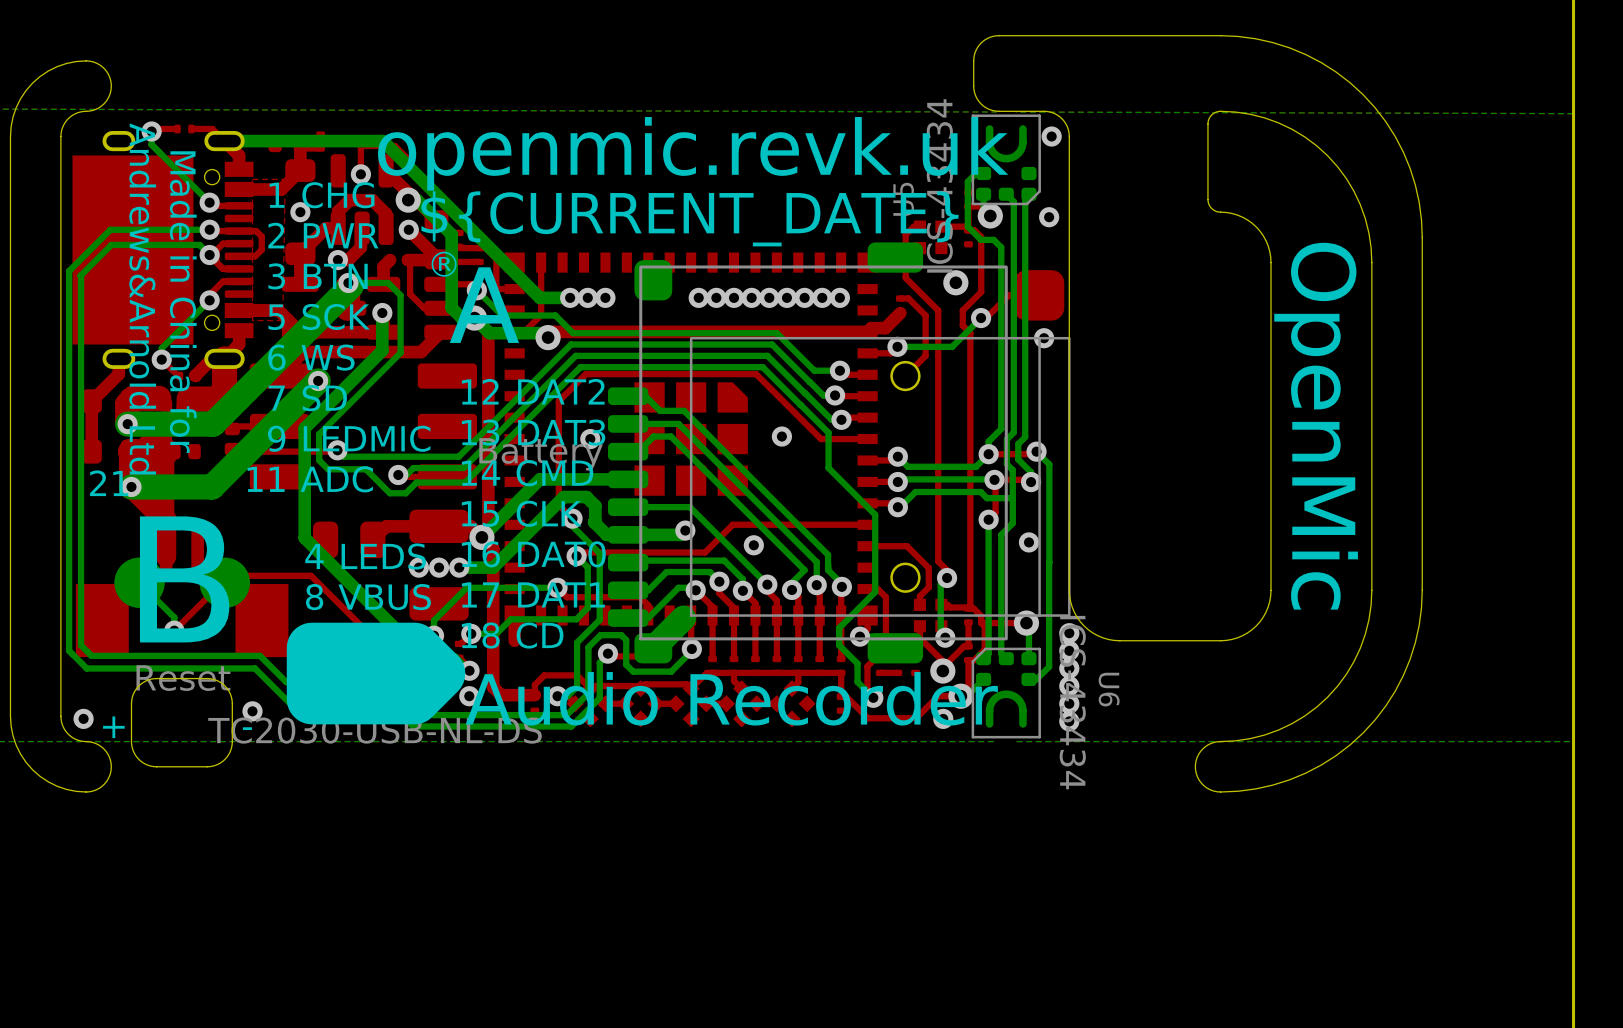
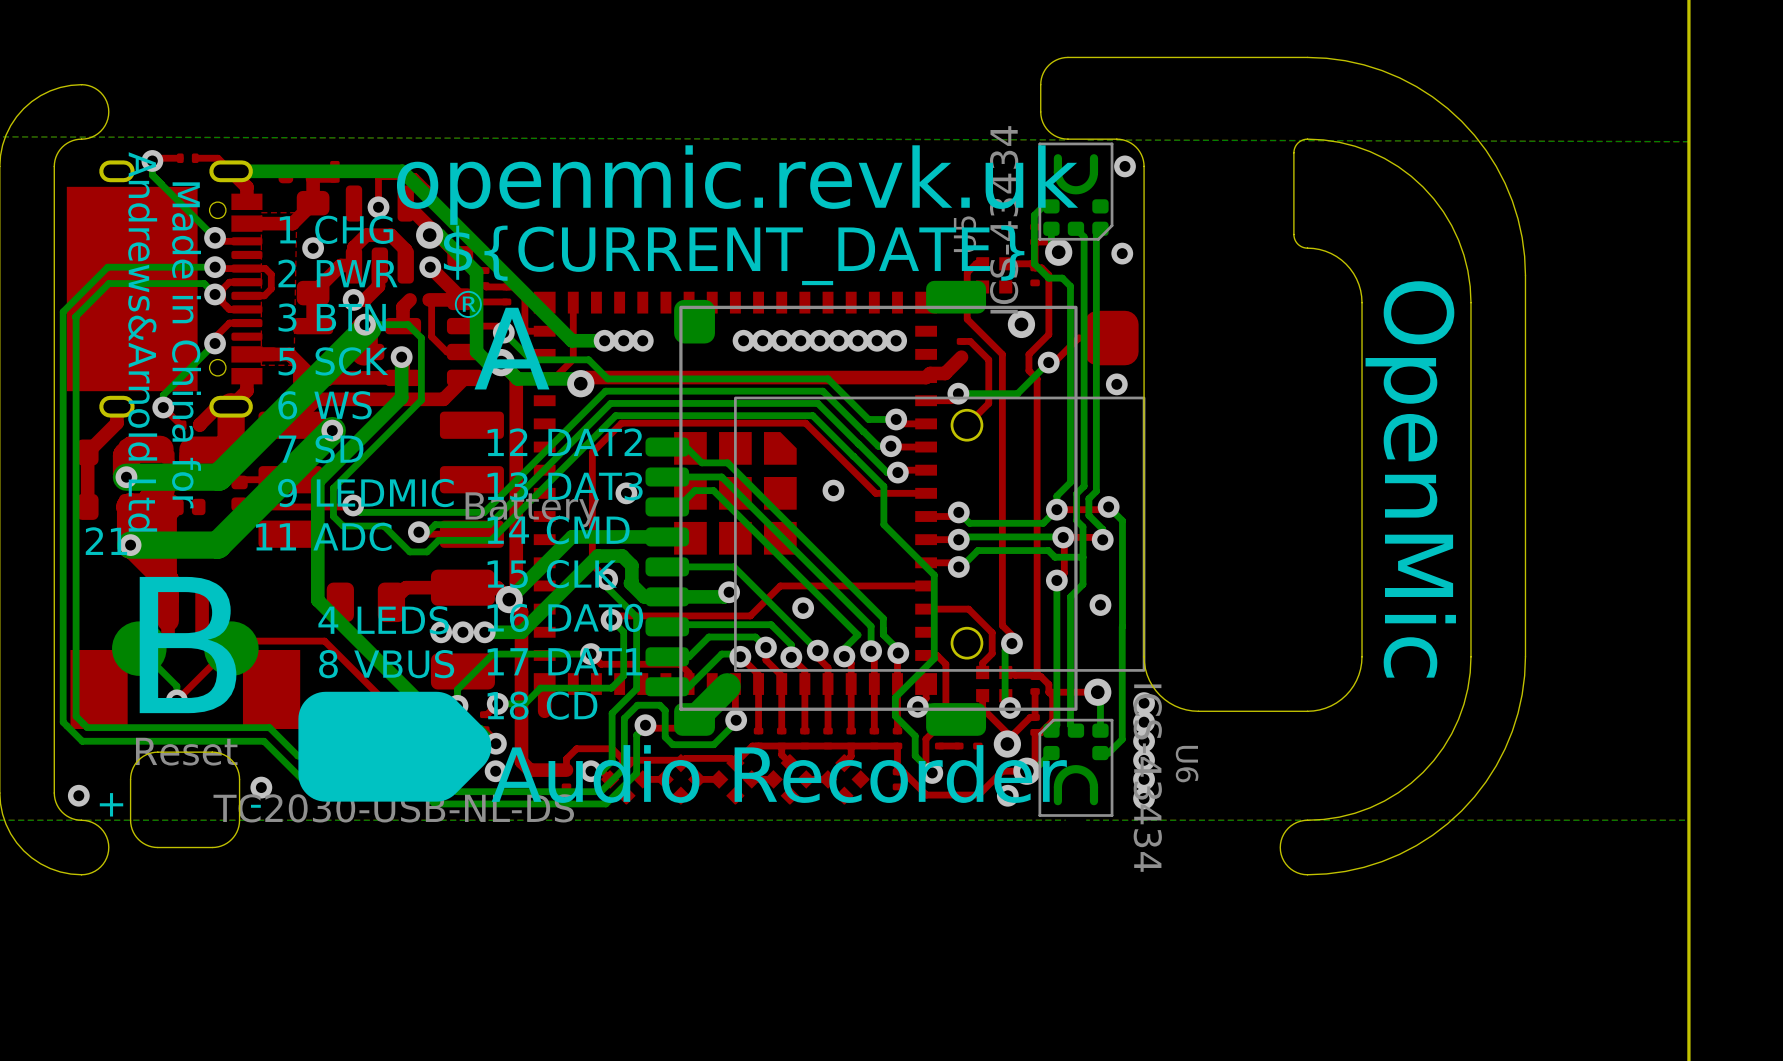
part footprint: [607, 242, 1071, 664] -> [645, 280, 1146, 736]
drawing position: (541, 454) -> (532, 509)

